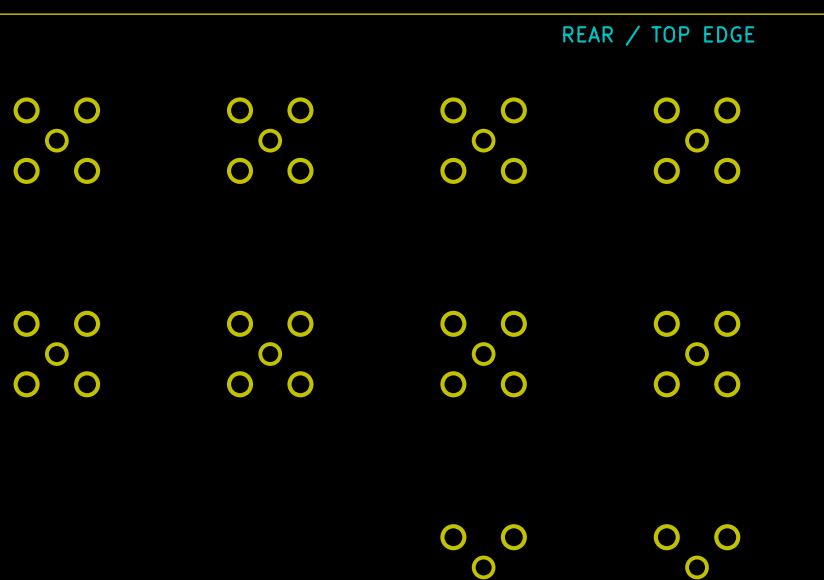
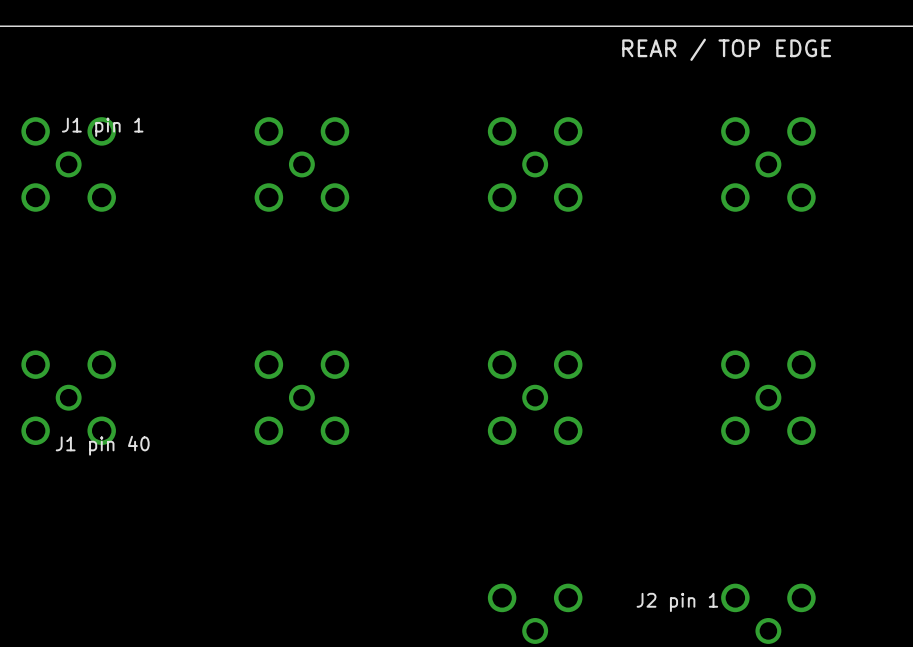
text: none -> J1 pin 1 (102, 127)
text: none -> J1 pin 40 (102, 445)
text: none -> J2 pin 1 (677, 602)

